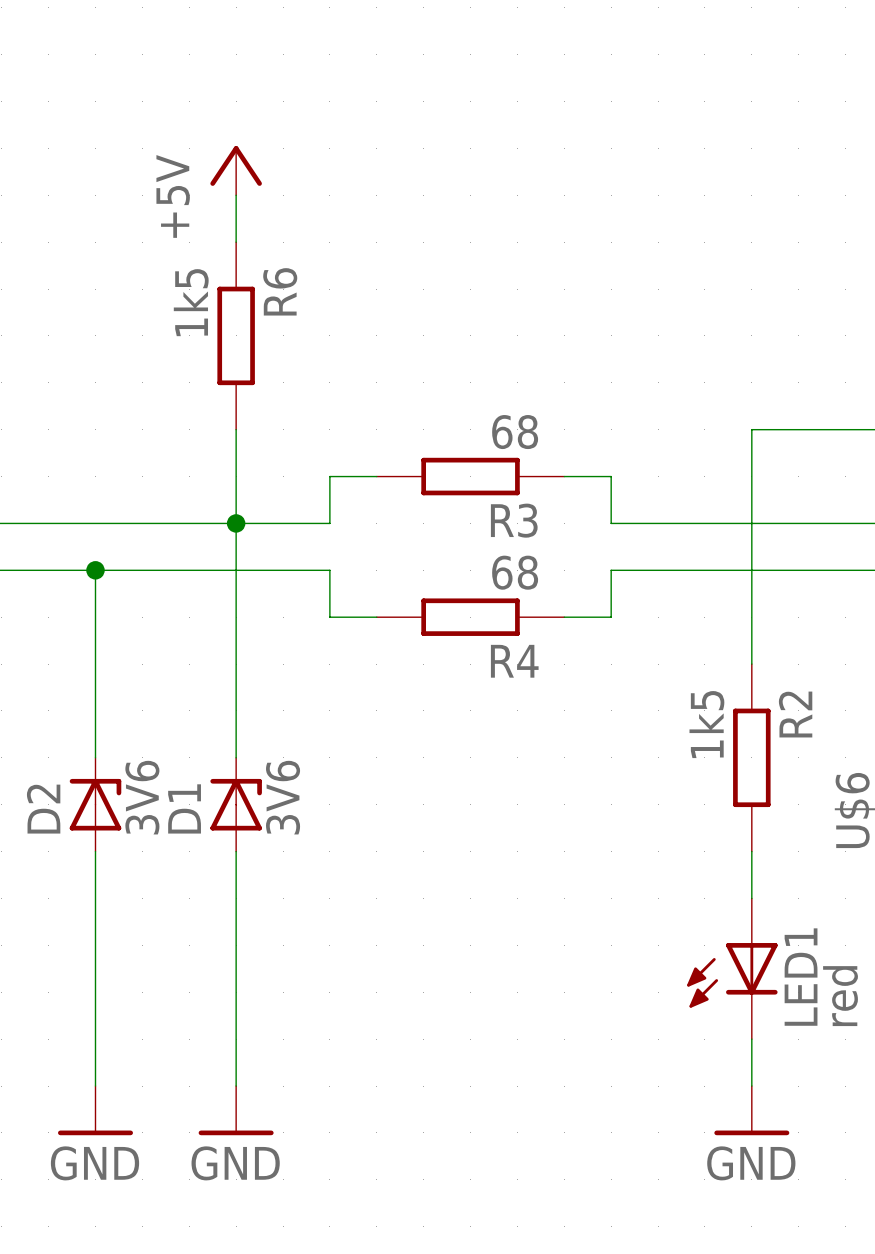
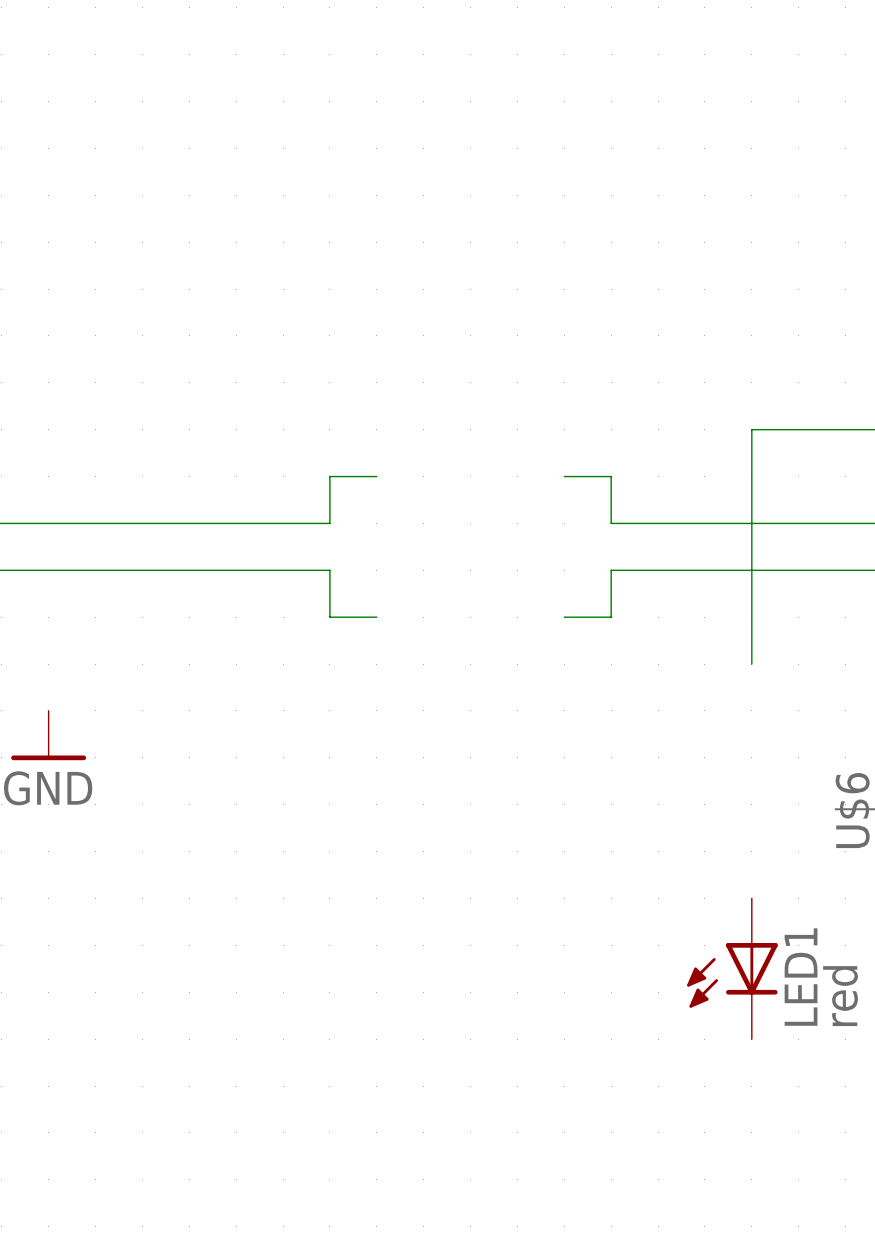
power symbol: +5V (236, 170) -> none
wire: (236, 195) (236, 242) -> none
R6: 1k5 (236, 335) -> none
wire: (236, 429) (236, 757) -> none
R3: 68 (470, 476) -> none
junction: (236, 523) -> none
wire: (95, 570) (95, 757) -> none
junction: (95, 570) -> none
R4: 68 (470, 617) -> none
power symbol: none -> GND (48, 735)
R2: 1k5 (751, 757) -> none
D2: 3V6 (95, 804) -> none
D1: 3V6 (236, 804) -> none
wire: (95, 851) (95, 1086) -> none
wire: (236, 851) (236, 1086) -> none
wire: (751, 851) (751, 898) -> none
wire: (751, 1039) (751, 1086) -> none
power symbol: GND (95, 1110) -> none
power symbol: GND (236, 1110) -> none
power symbol: GND (751, 1110) -> none

